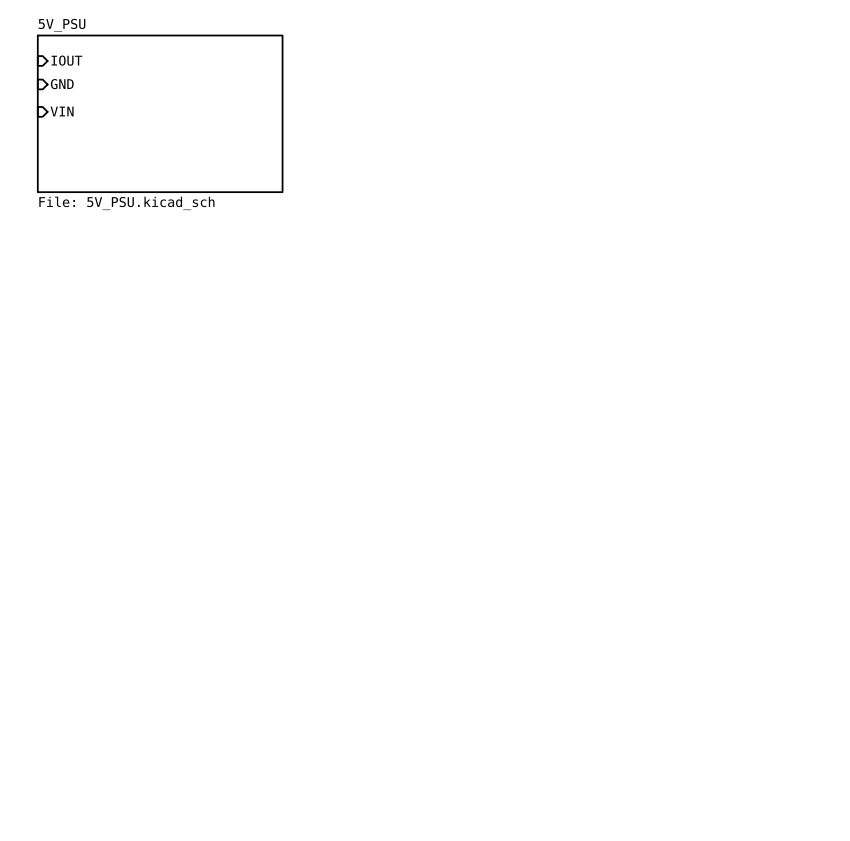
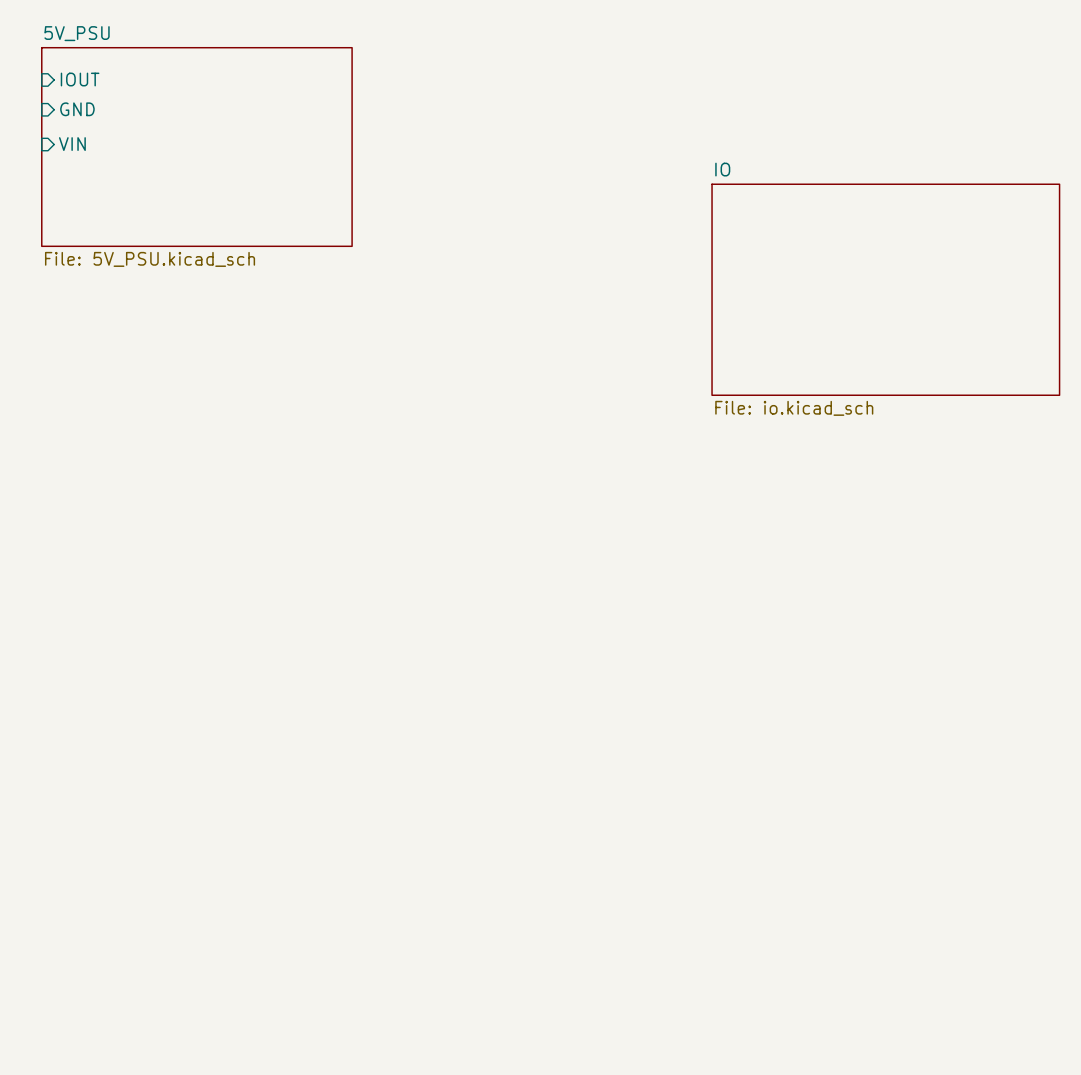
sheet IO: none -> File: io.kicad_sch (885, 289)

